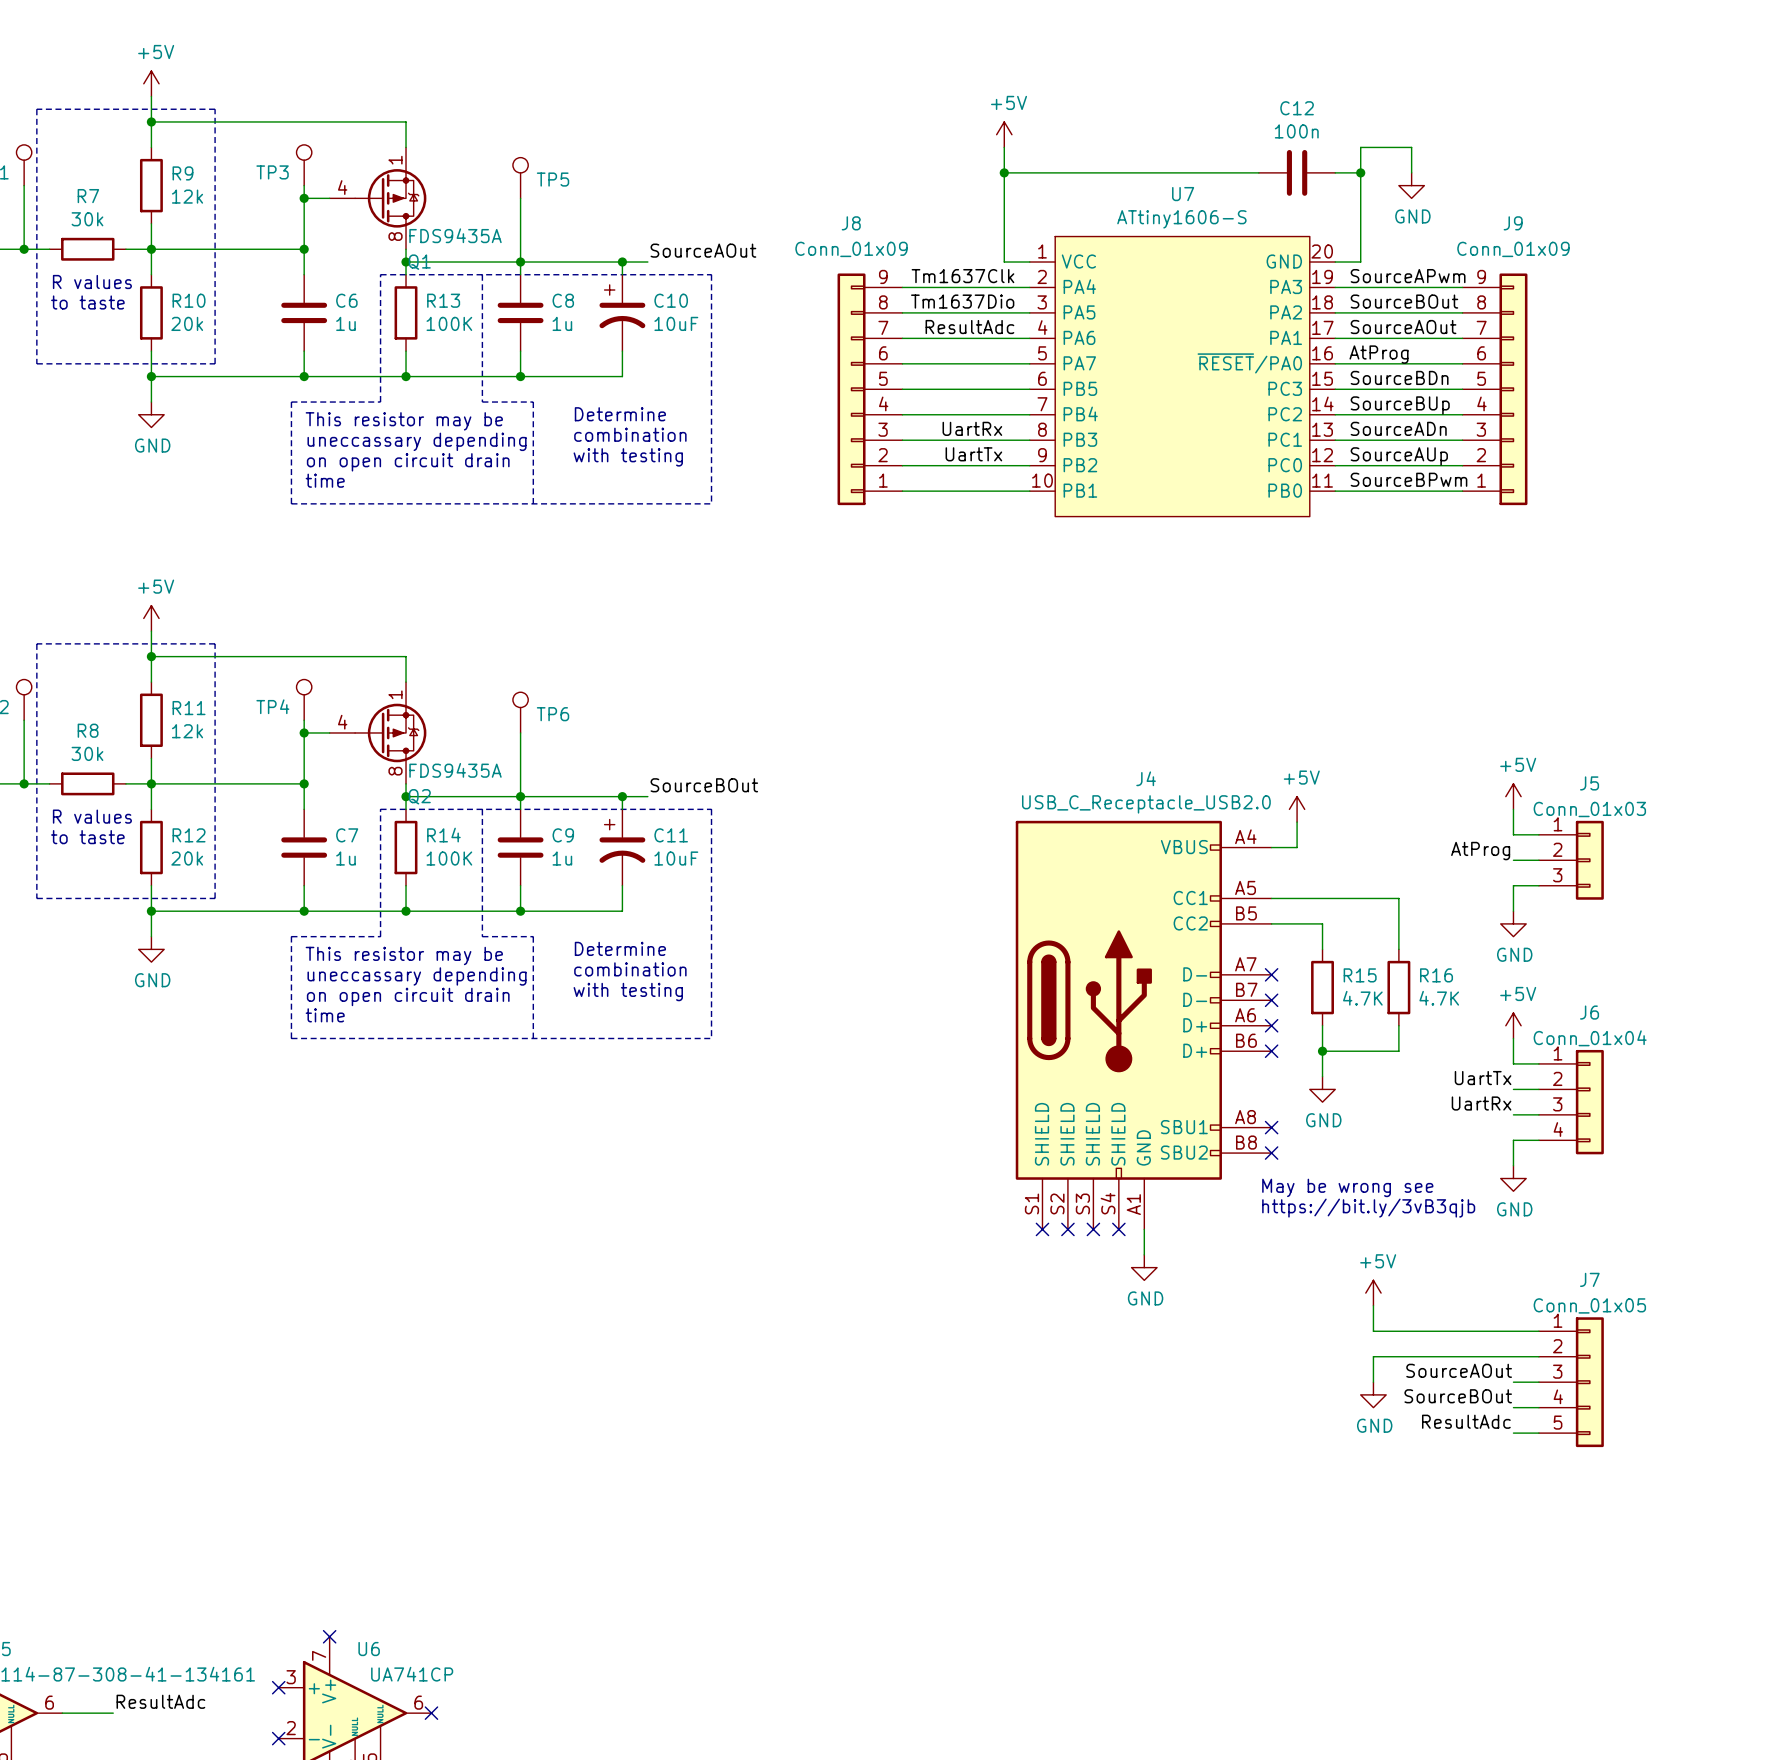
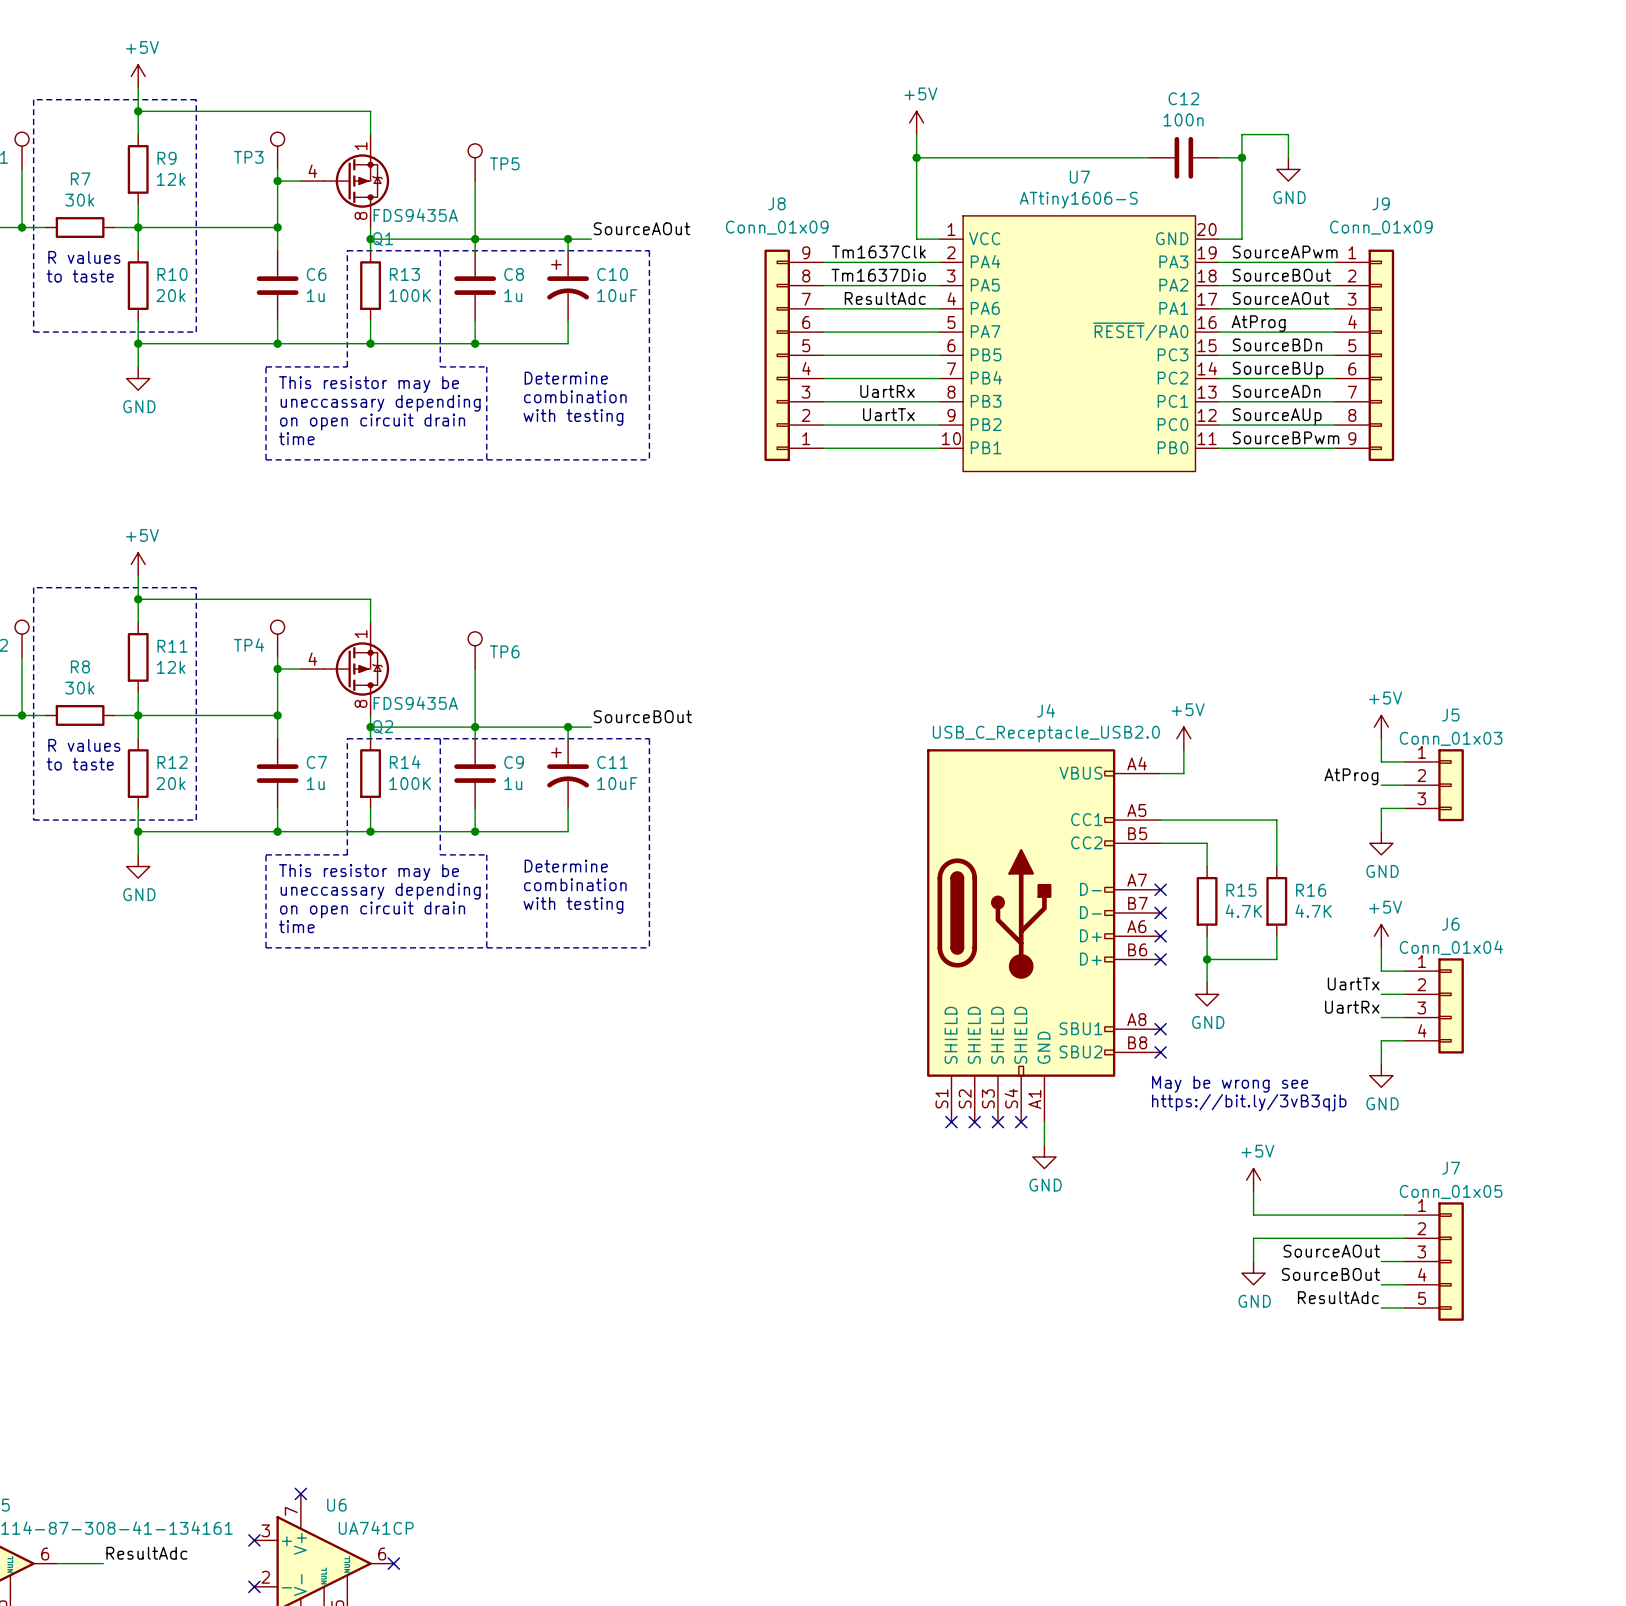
J9 flip: as is (1513, 389) -> up-down (1381, 355)

